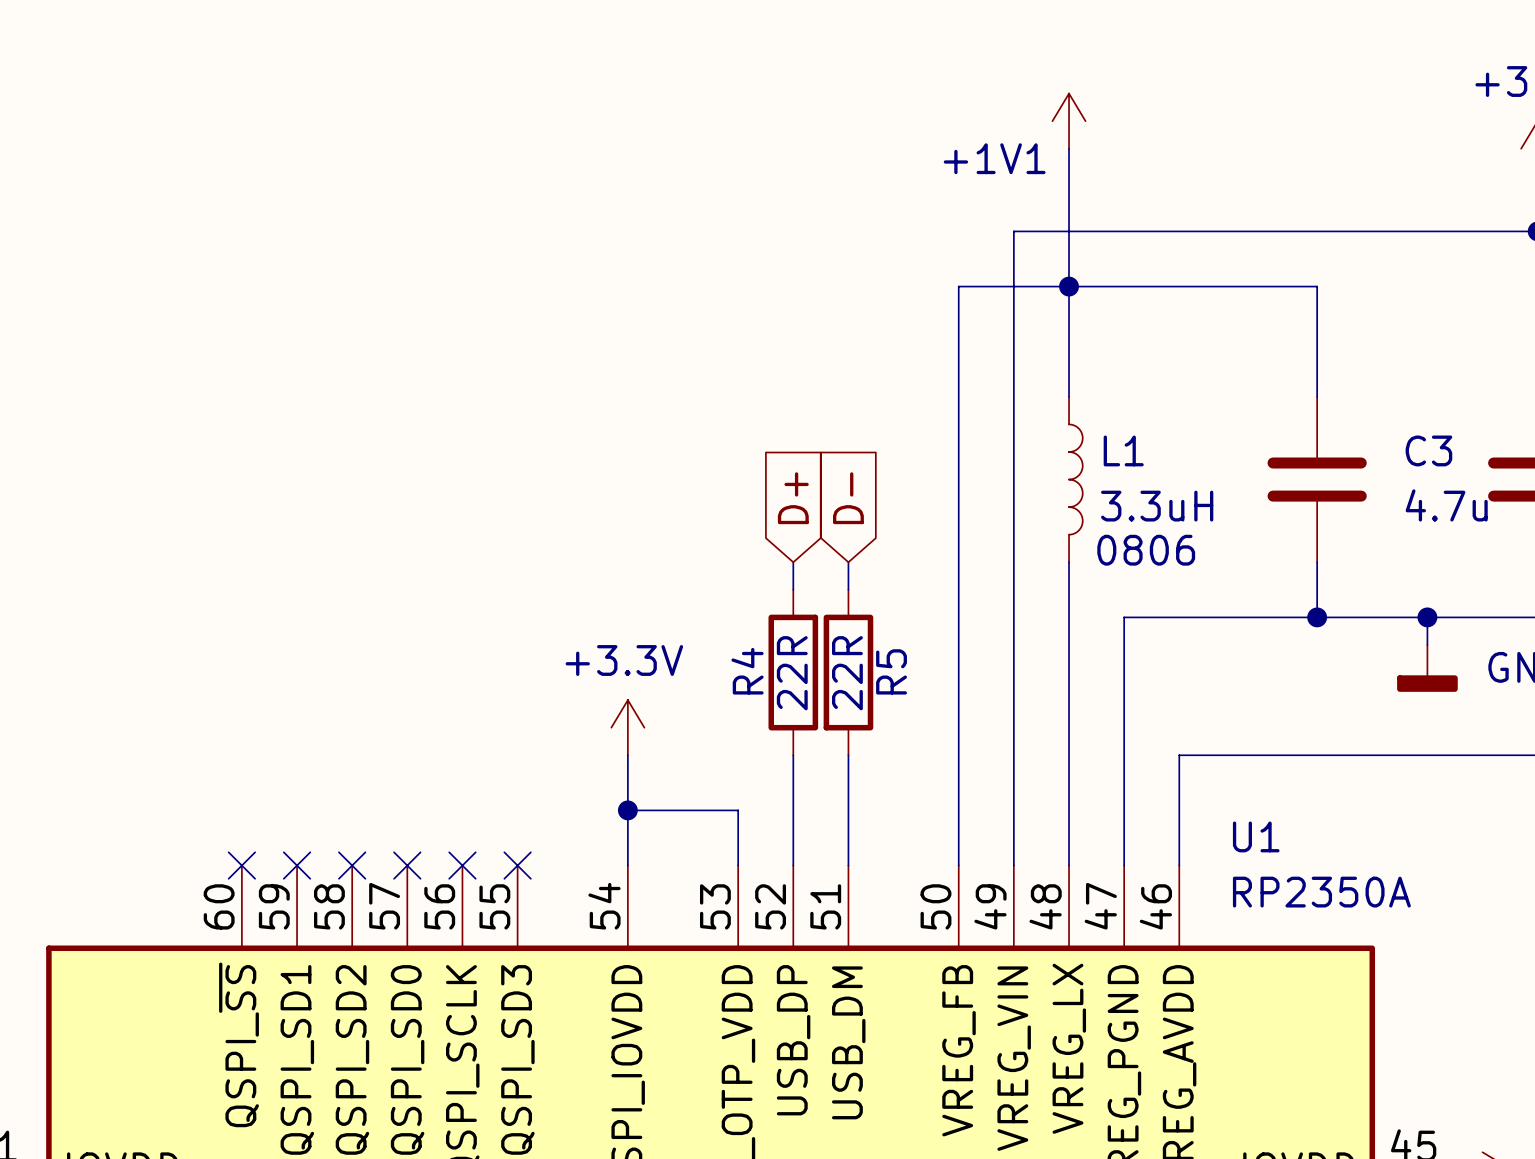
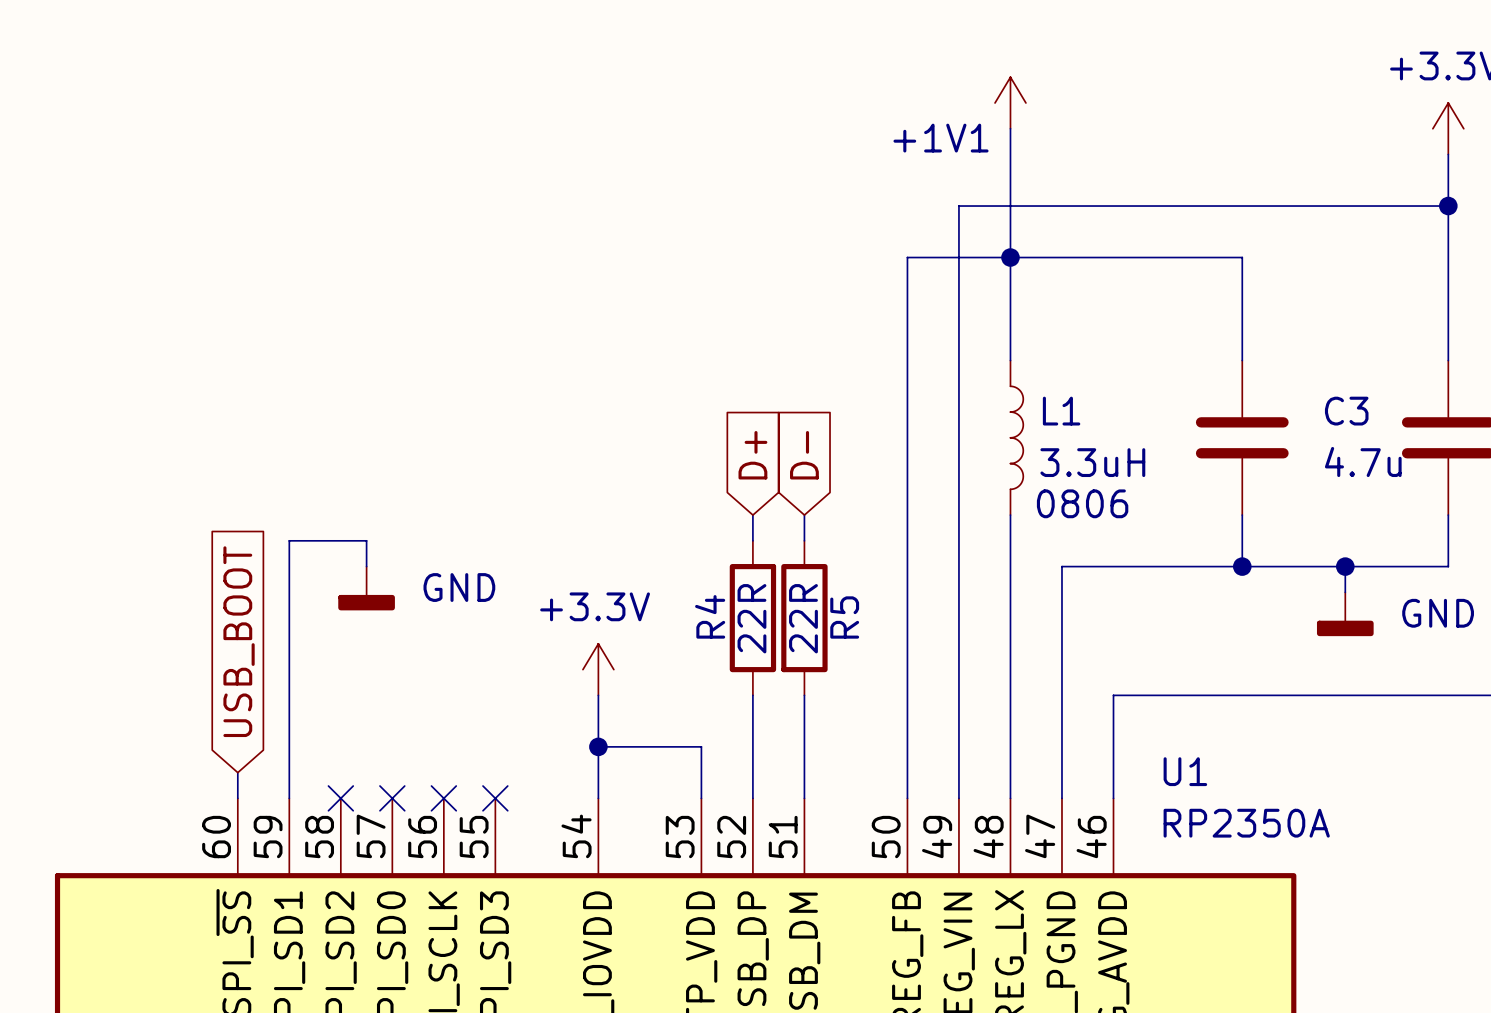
wire: none -> (366, 566) (366, 540) (289, 540) (289, 798)
power symbol: none -> GND (366, 588)
global label: none -> USB_BOOT (239, 641)
wire: none -> (237, 772) (237, 798)
no-connect mark: (241, 865) -> none
no-connect mark: (297, 865) -> none

